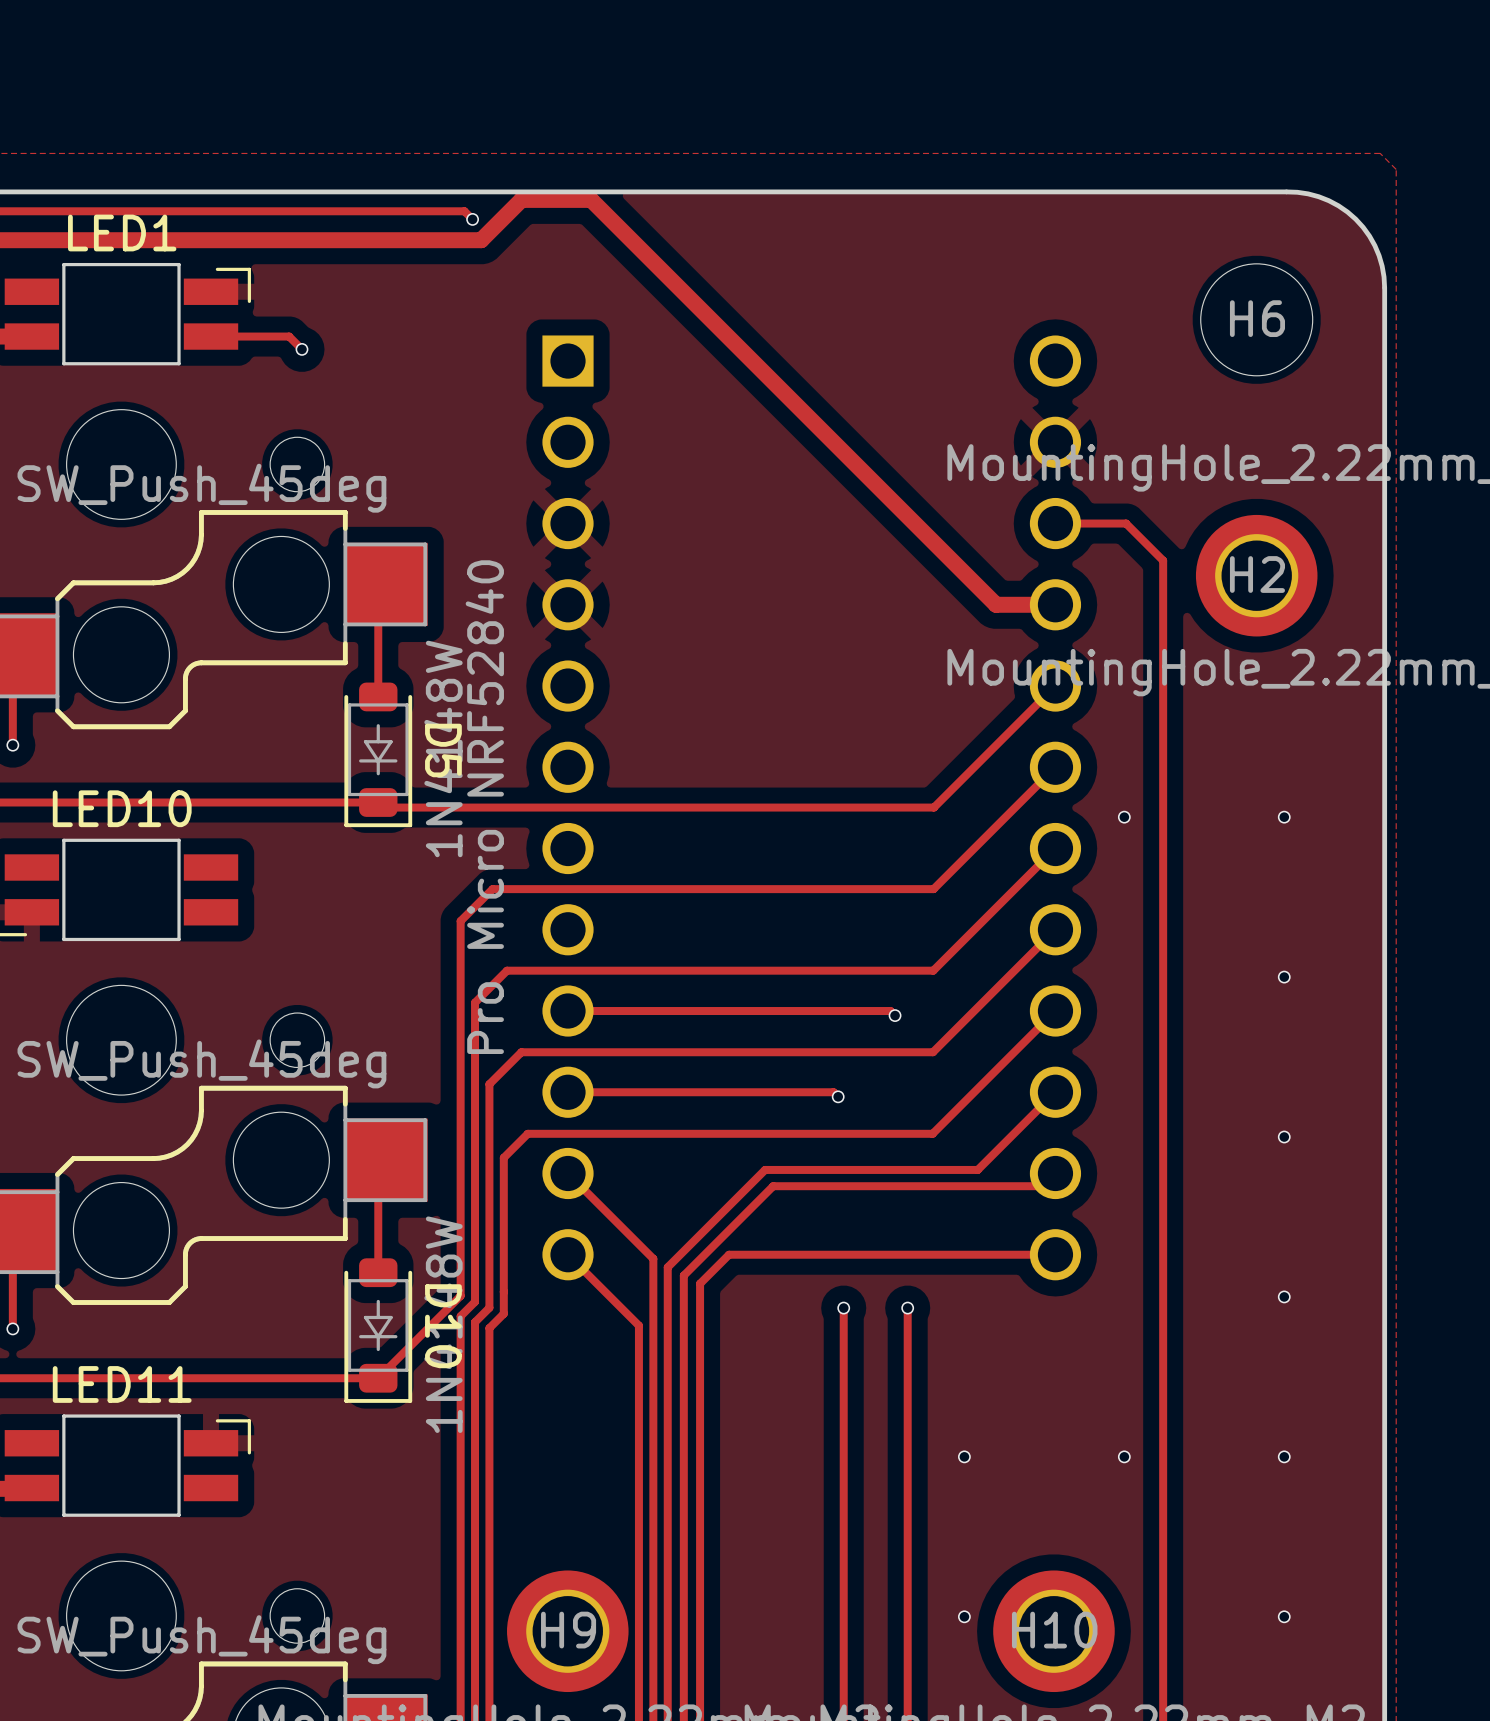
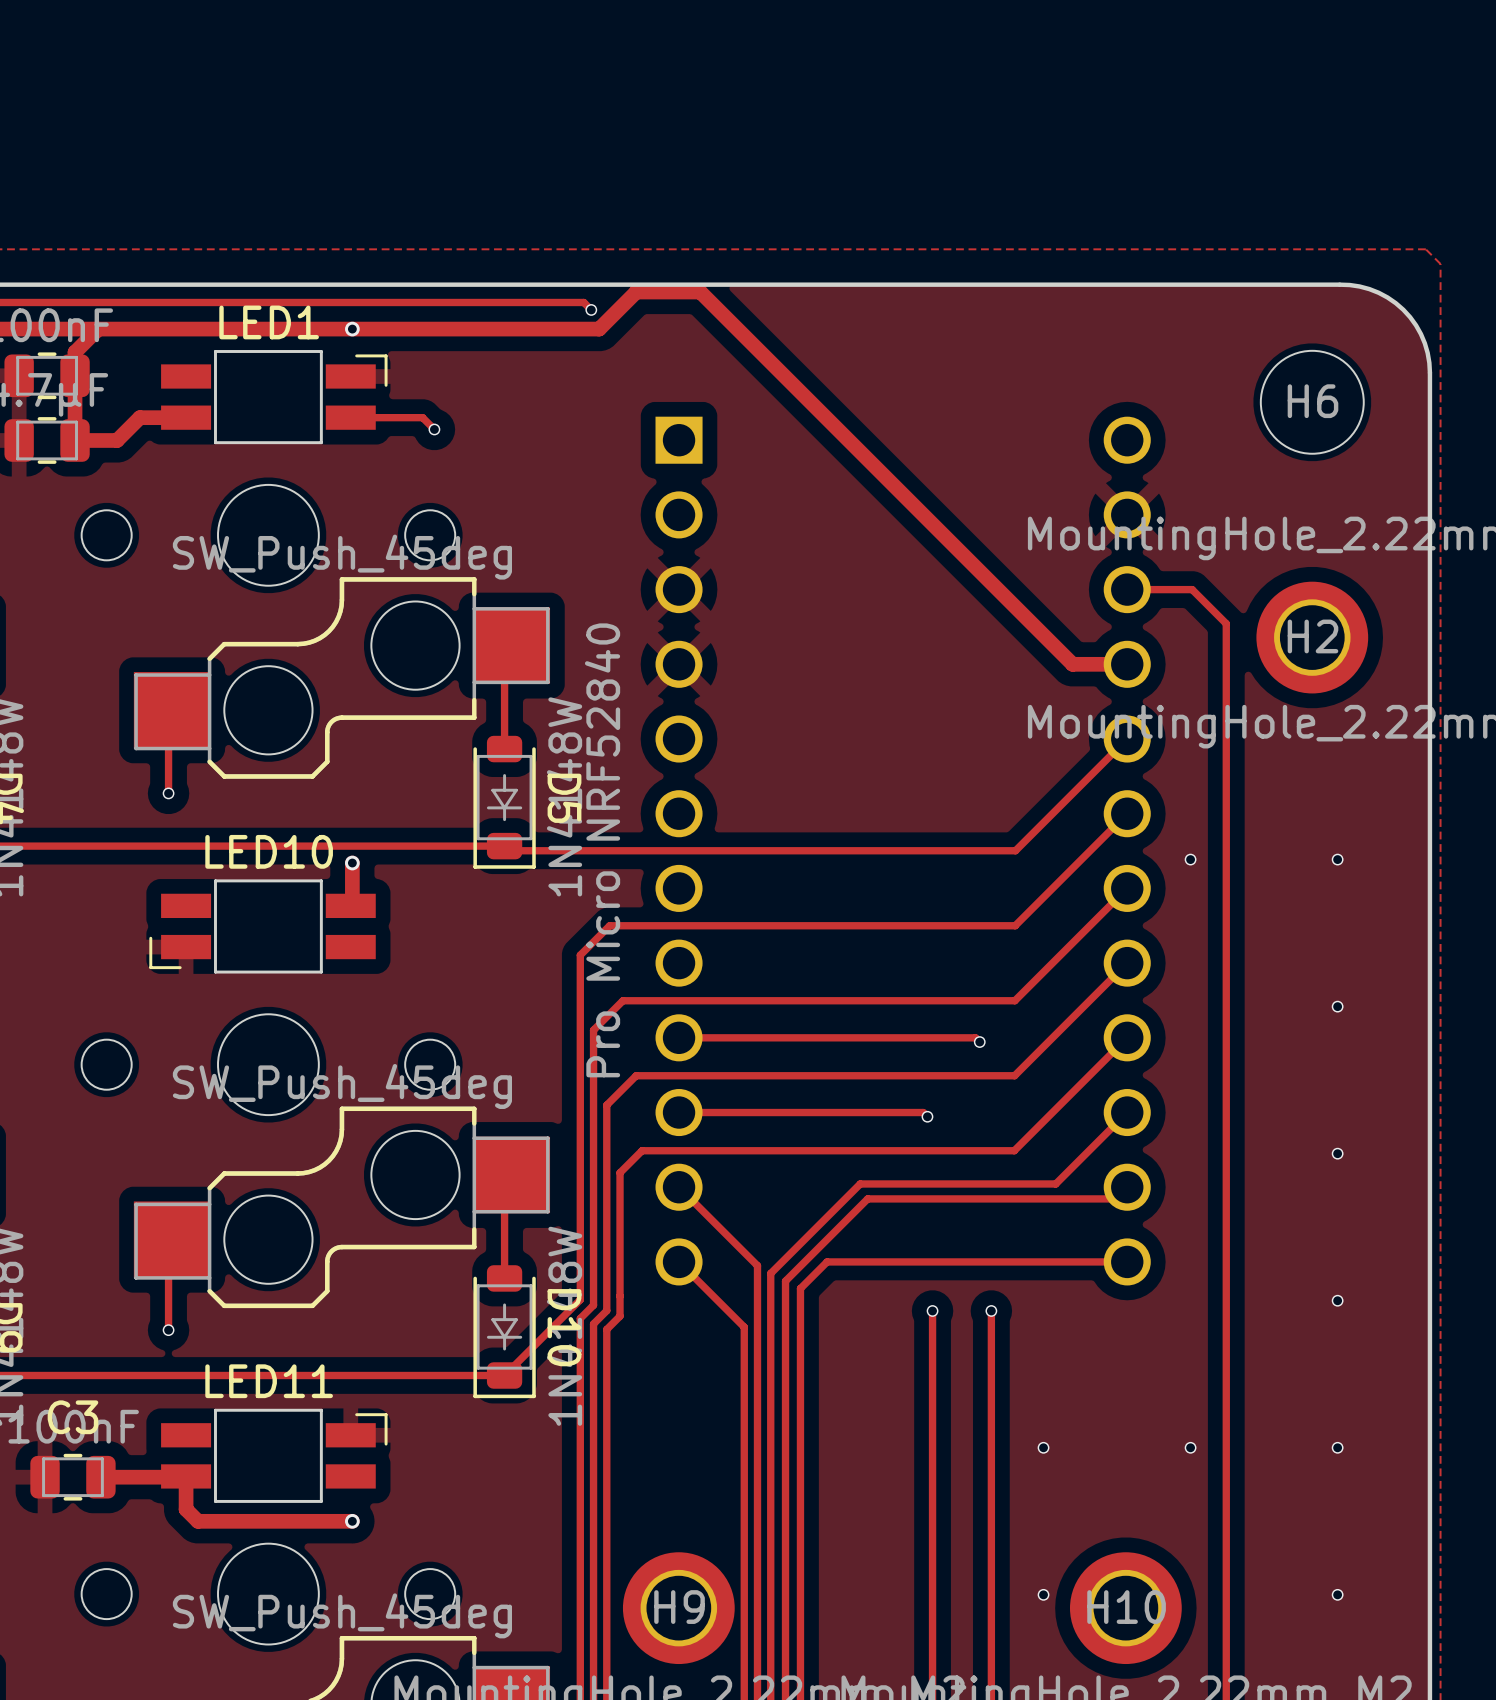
via: none -> (352, 329)
track: none -> (352, 863) (352, 904) (350, 905)
via: none -> (352, 863)
track: none -> (186, 1476) (186, 1509) (197, 1521) (352, 1521)
via: none -> (352, 1521)

